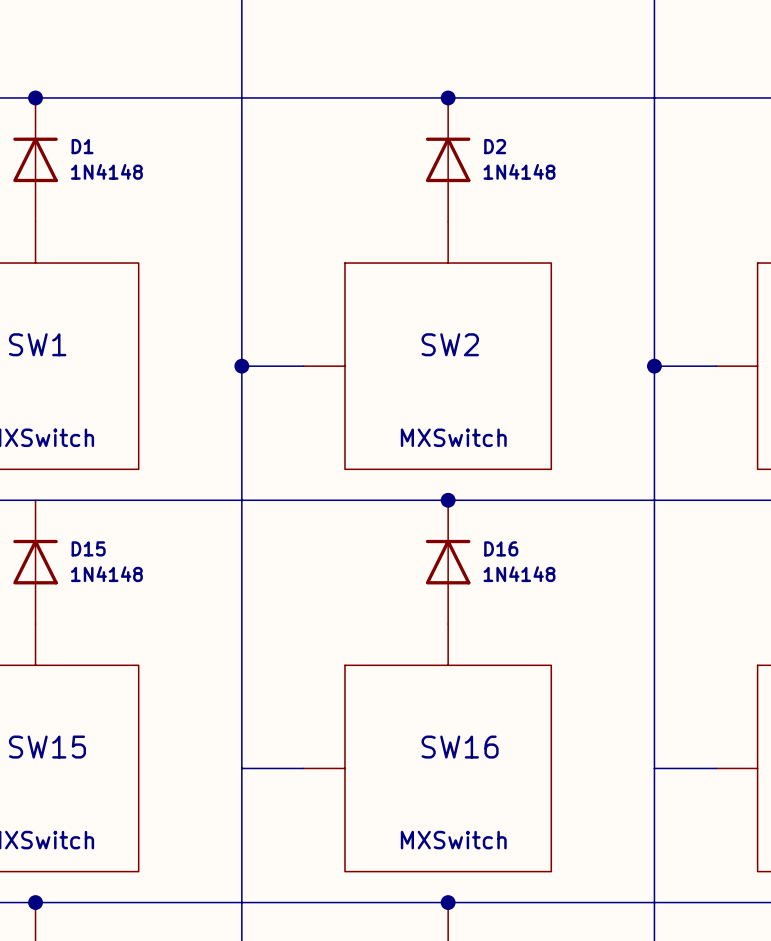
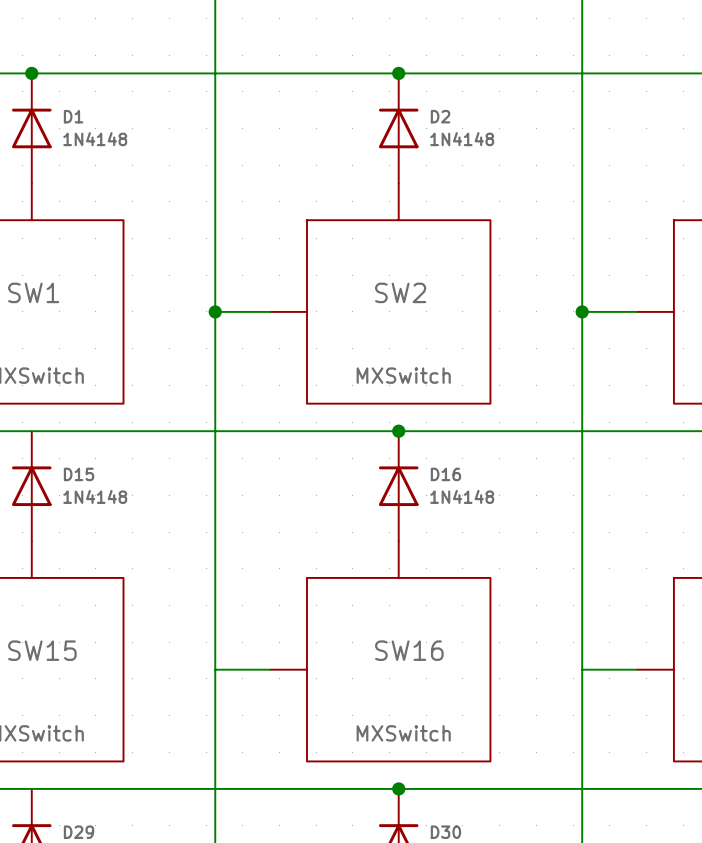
junction: (35, 902) -> none

